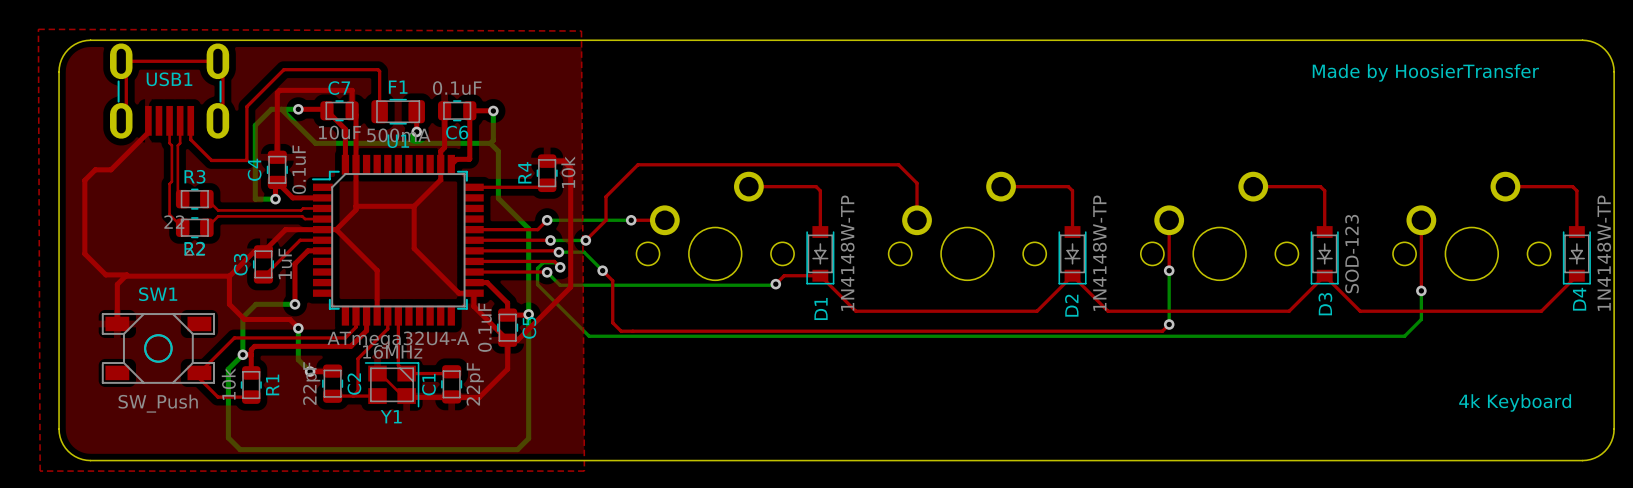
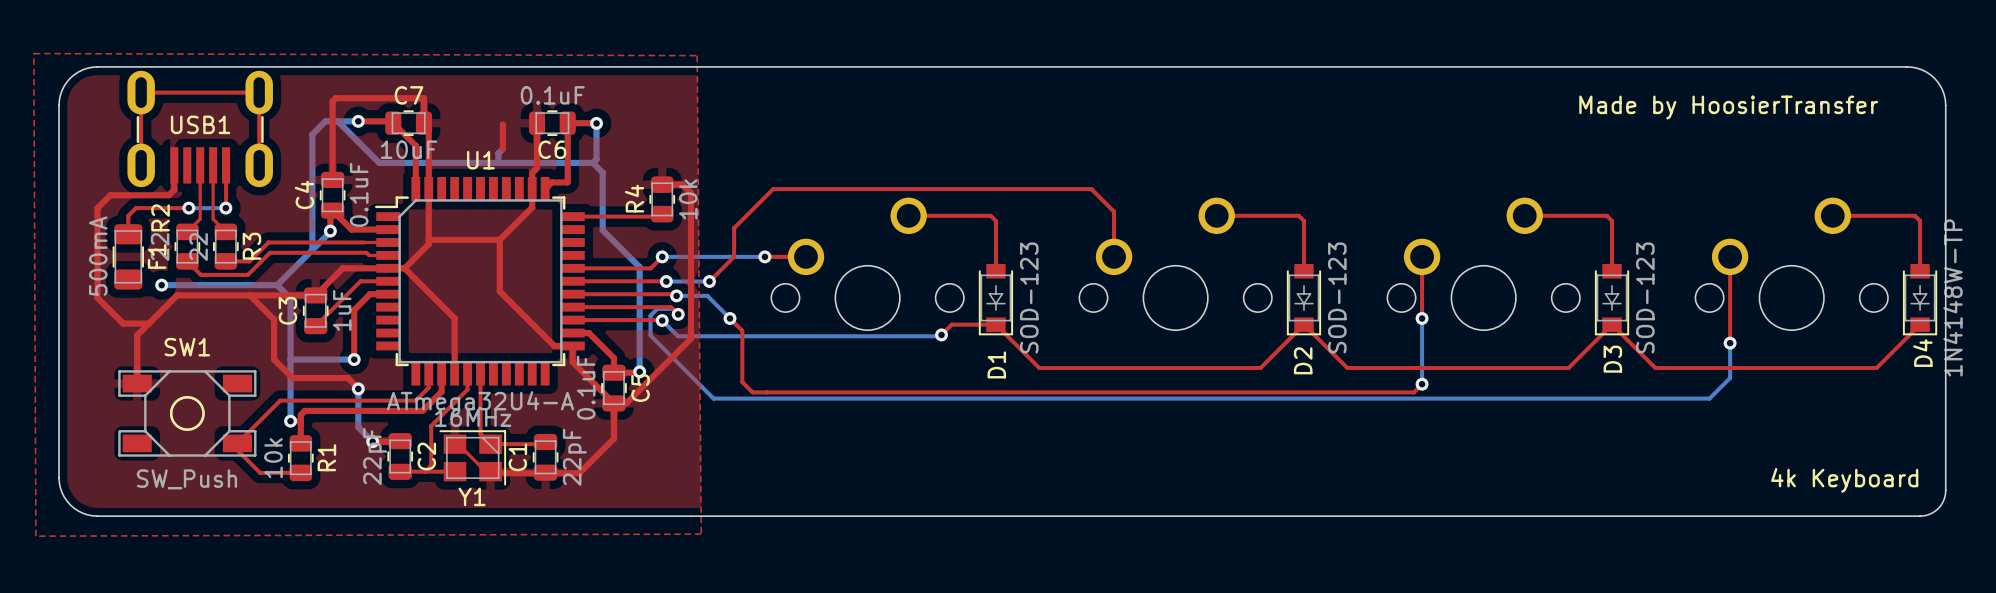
top zone outline: (38, 29) (40, 471) (584, 471) (581, 31) (38, 29) -> (33, 53) (35, 536) (701, 534) (697, 55) (33, 53)
board edge: (90, 40) (1590, 41) (1598, 44) (1607, 52) (1613, 63) (1614, 71) (1613, 437) (1607, 448) (1601, 454) (1590, 459) (1582, 460) (82, 459) (74, 456) (65, 448) (61, 441) (59, 429) (59, 71) (61, 59) (68, 49) (78, 42) (90, 40) -> (97, 66) (82, 69) (70, 78) (61, 90) (59, 105) (59, 482) (61, 492) (70, 504) (87, 514) (1920, 516) (1935, 510) (1944, 497) (1945, 105) (1942, 90) (1937, 81) (1930, 74) (1917, 68) (97, 66)
text position: Made by HoosierTransfer (1425, 72) -> Made by HoosierTransfer (1728, 107)
USB1 name position: USB1 (169, 79) -> USB1 (200, 124)
USB1 position: (169, 91) -> (200, 128)
top track: (379, 111) (379, 71) (378, 69) (283, 69) (246, 106) (246, 160) (211, 160) (190, 139) (190, 120) -> none
F1 rotation: 0° (398, 111) -> 90° clockwise (128, 256)
F1 position: (398, 111) -> (128, 256)
top track: (126, 120) (126, 61) (222, 61) (222, 120) -> (141, 165) (141, 92) (259, 92) (259, 165)
top track: (148, 120) (148, 132) (110, 169) -> (174, 165) (174, 189) (168, 195) (129, 195)
top track: (169, 120) (169, 143) (171, 145) (169, 214) (182, 227) -> none
top track: (180, 120) (180, 143) (177, 145) (177, 194) (182, 199) -> none
bottom track: (260, 120) (255, 125) (255, 199) (275, 199) -> (312, 134) (312, 249)
via: (416, 131) -> none
top track: none -> (200, 165) (200, 219) (187, 231)
top track: none -> (213, 165) (213, 219) (225, 231)
top track: none -> (226, 165) (226, 207)
top track: none -> (188, 208) (136, 208) (128, 215) (128, 234)
bottom track: none -> (188, 208) (225, 208)
via: none -> (188, 208)
via: none -> (225, 208)
bottom track: none -> (328, 230) (328, 233) (277, 285)
R3 rotation: 0° (194, 199) -> 90° clockwise (225, 246)
top track: (206, 199) (218, 210) (301, 210) (303, 208) -> (225, 261) (249, 261) (268, 242) (364, 242)
top track: (307, 219) (302, 216) (218, 216) (206, 227) -> (369, 255) (366, 252) (270, 252) (247, 274) (200, 274) (187, 261)
R2 rotation: 0° (194, 227) -> 90° clockwise (187, 246)
R2 position: (194, 227) -> (187, 246)
bottom track: none -> (161, 285) (277, 285)
via: none -> (161, 285)
bottom track: none -> (277, 285) (290, 298) (290, 375)
top track: none -> (249, 295) (274, 319) (274, 325)
top track: (254, 251) (229, 276) (125, 276) (126, 274) -> (304, 295) (177, 295) (147, 325)
D1 value: 1N4148W-TP (847, 253) -> SOD-123 (1029, 297)
D2 value: 1N4148W-TP (1099, 253) -> SOD-123 (1337, 297)
bottom track: (256, 304) (242, 317) -> (306, 359) (290, 359)
bottom track: (528, 314) (528, 438) (517, 449) (240, 449) (228, 437) (228, 369) (242, 354) -> none

